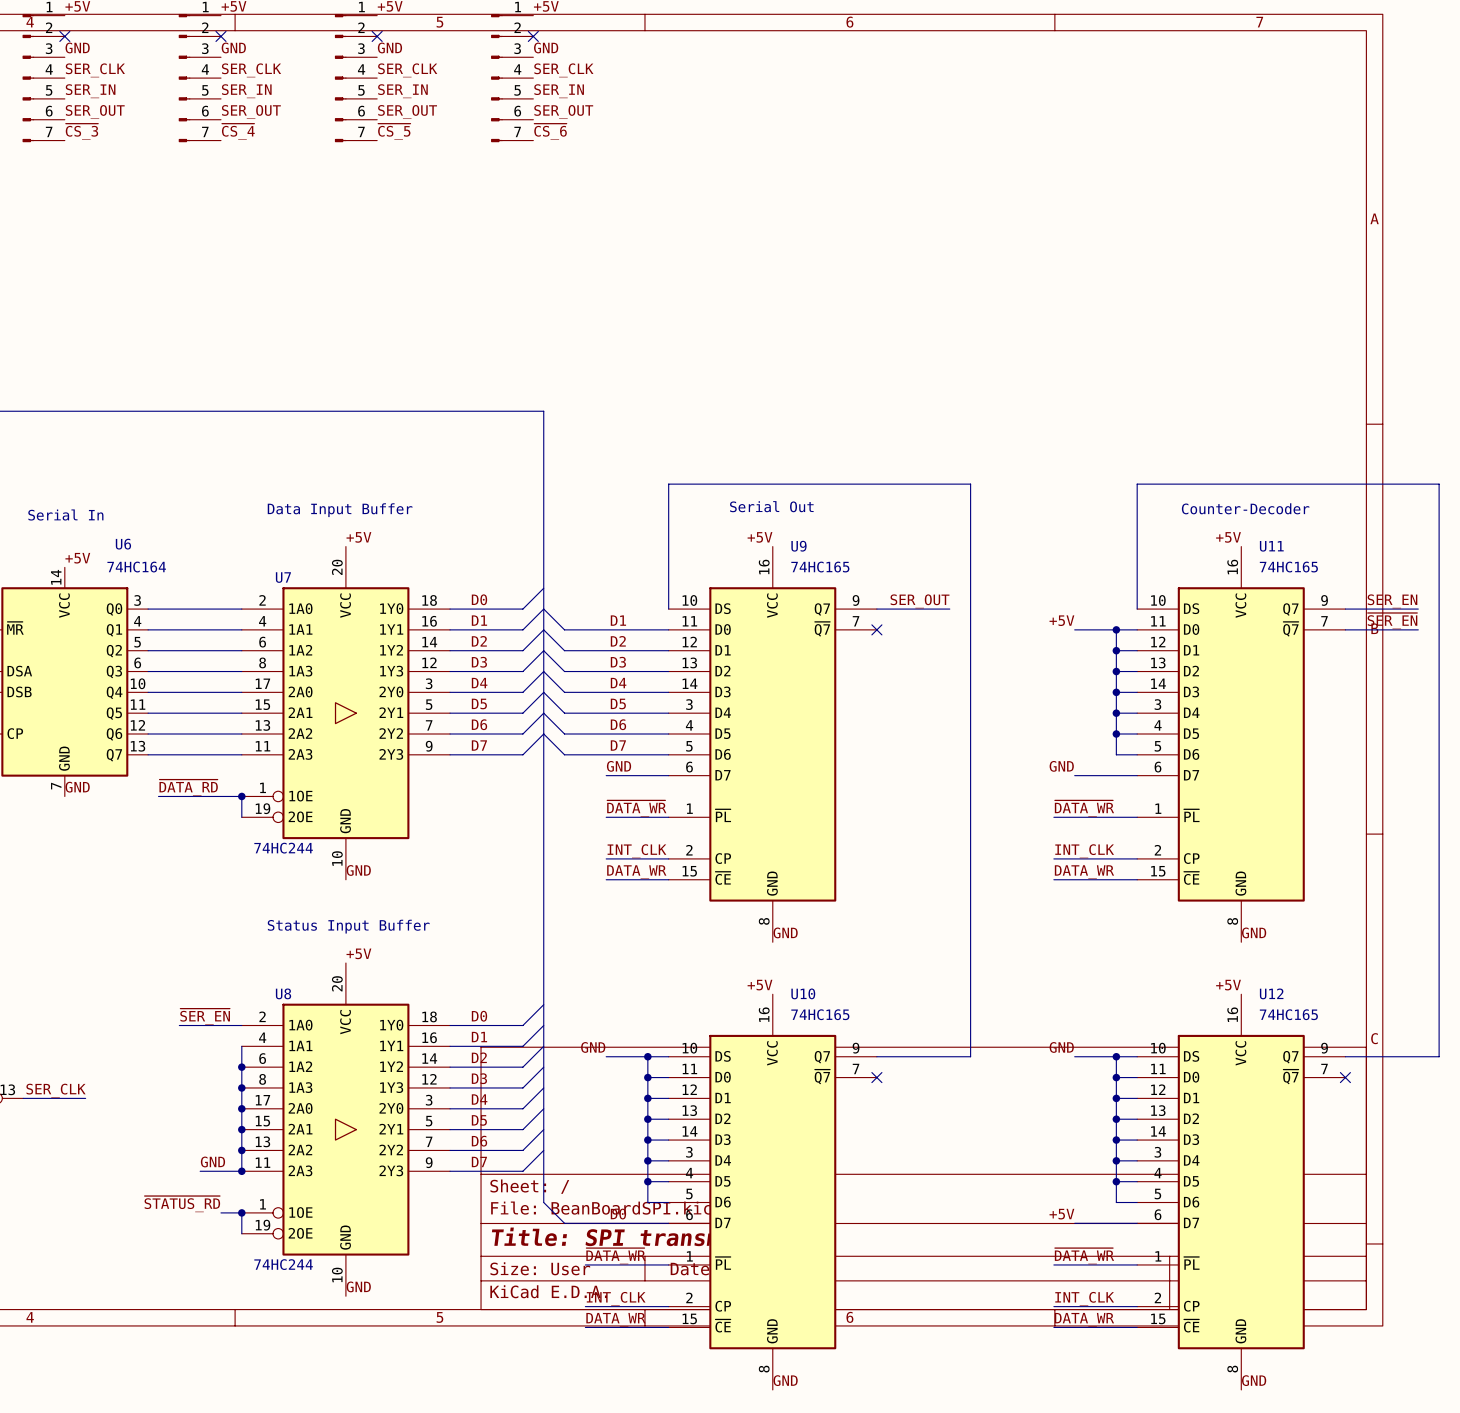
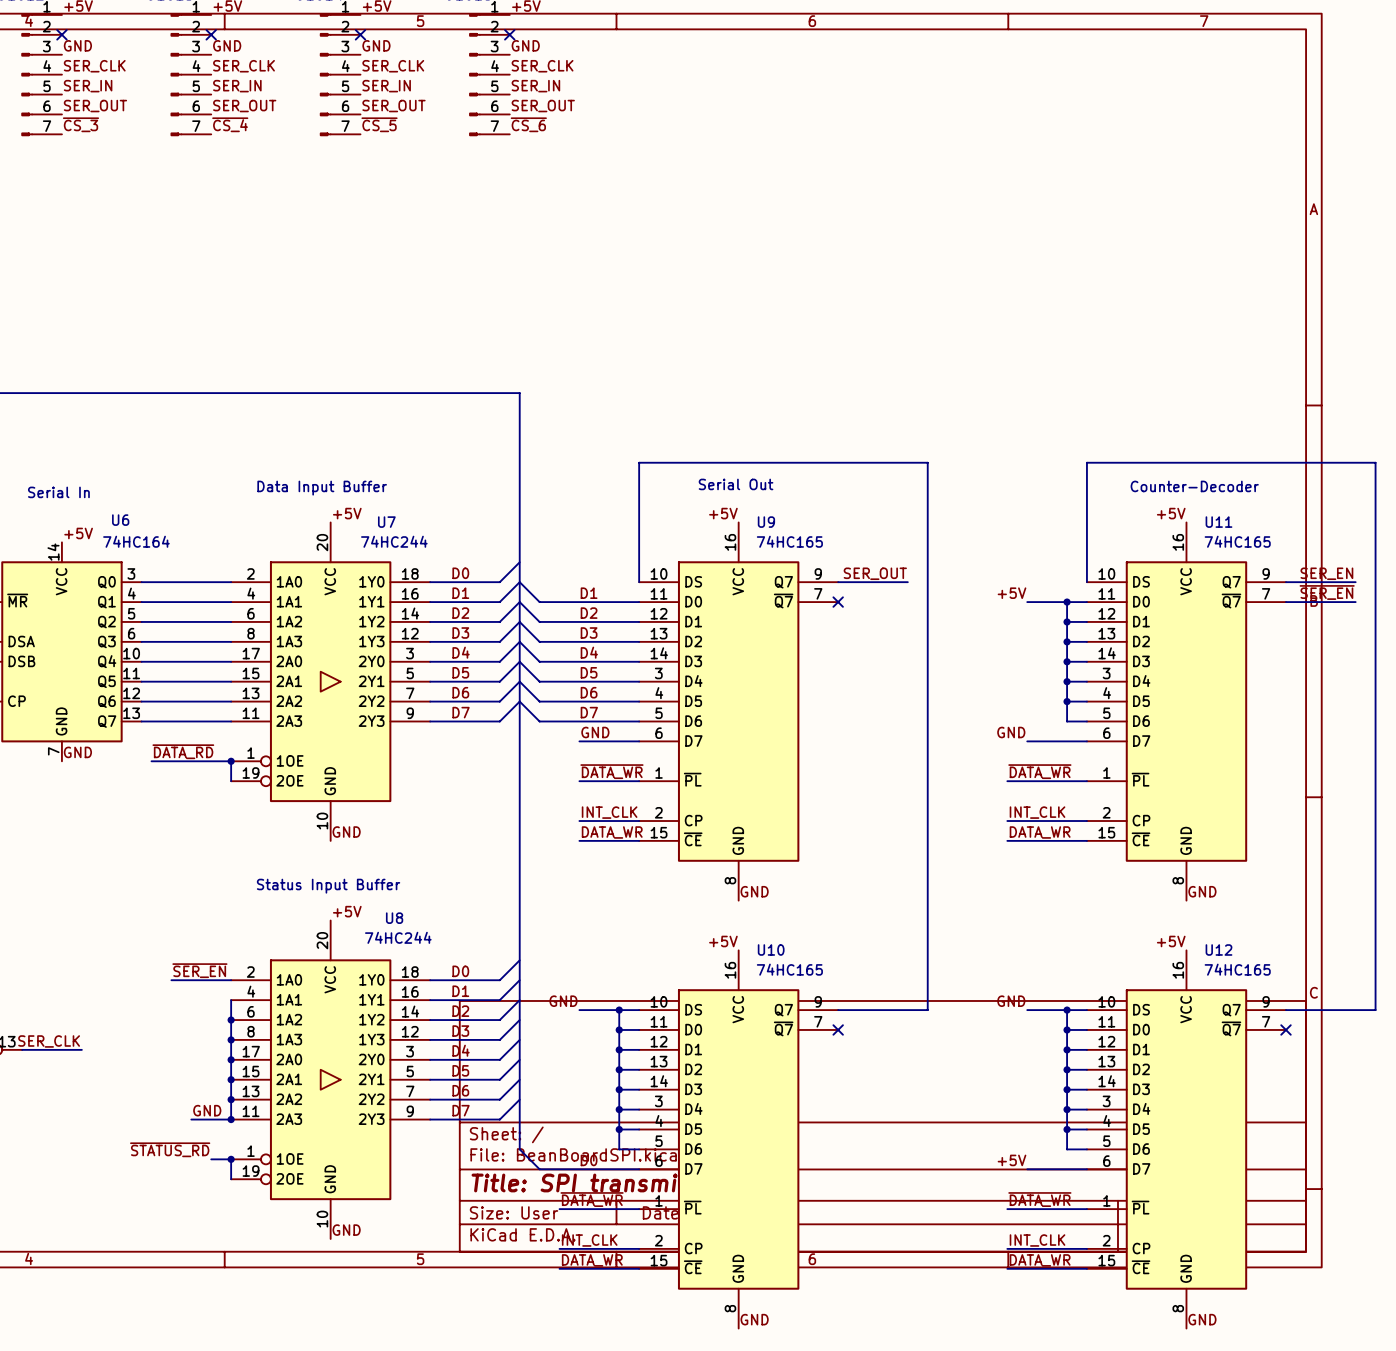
U7 name position: U7 (283, 577) -> U7 (386, 522)
U7 value position: 74HC244 (283, 848) -> 74HC244 (394, 541)
U8 name position: U8 (283, 993) -> U8 (394, 918)
U8 value position: 74HC244 (283, 1264) -> 74HC244 (398, 937)

